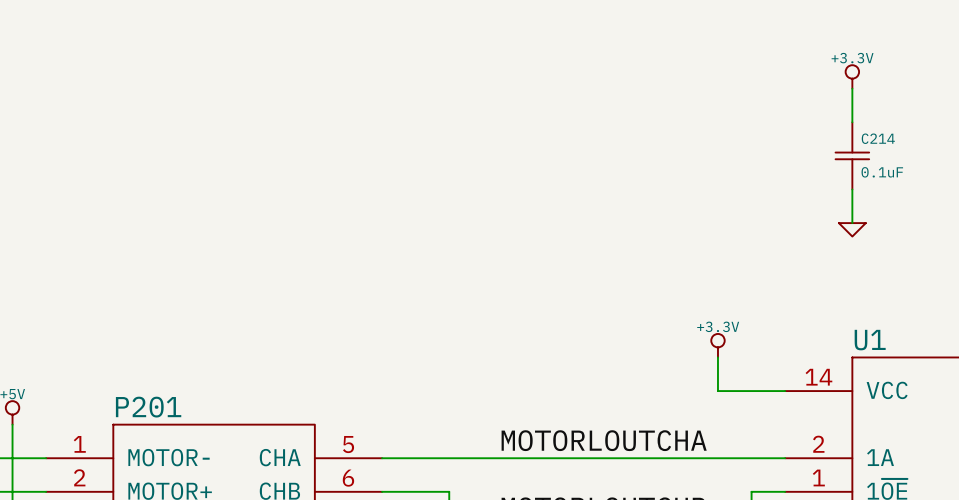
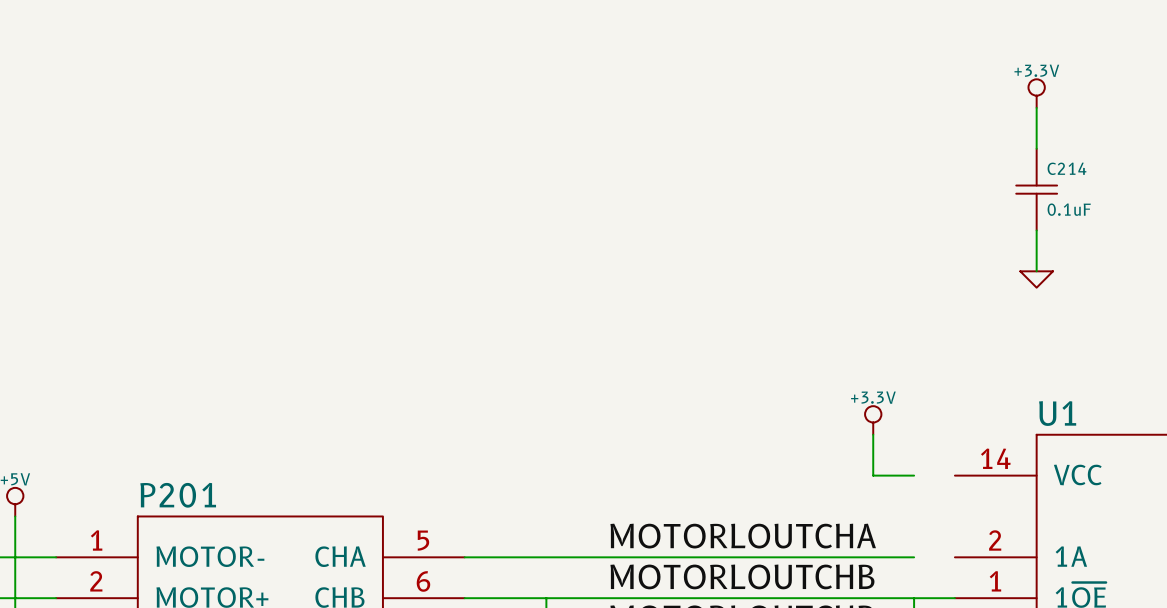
wire: (751, 391) (785, 391) -> none
wire: (751, 458) (785, 458) -> none
label: none -> MOTORLOUTCHB (742, 576)
wire: none -> (546, 598) (914, 598)

